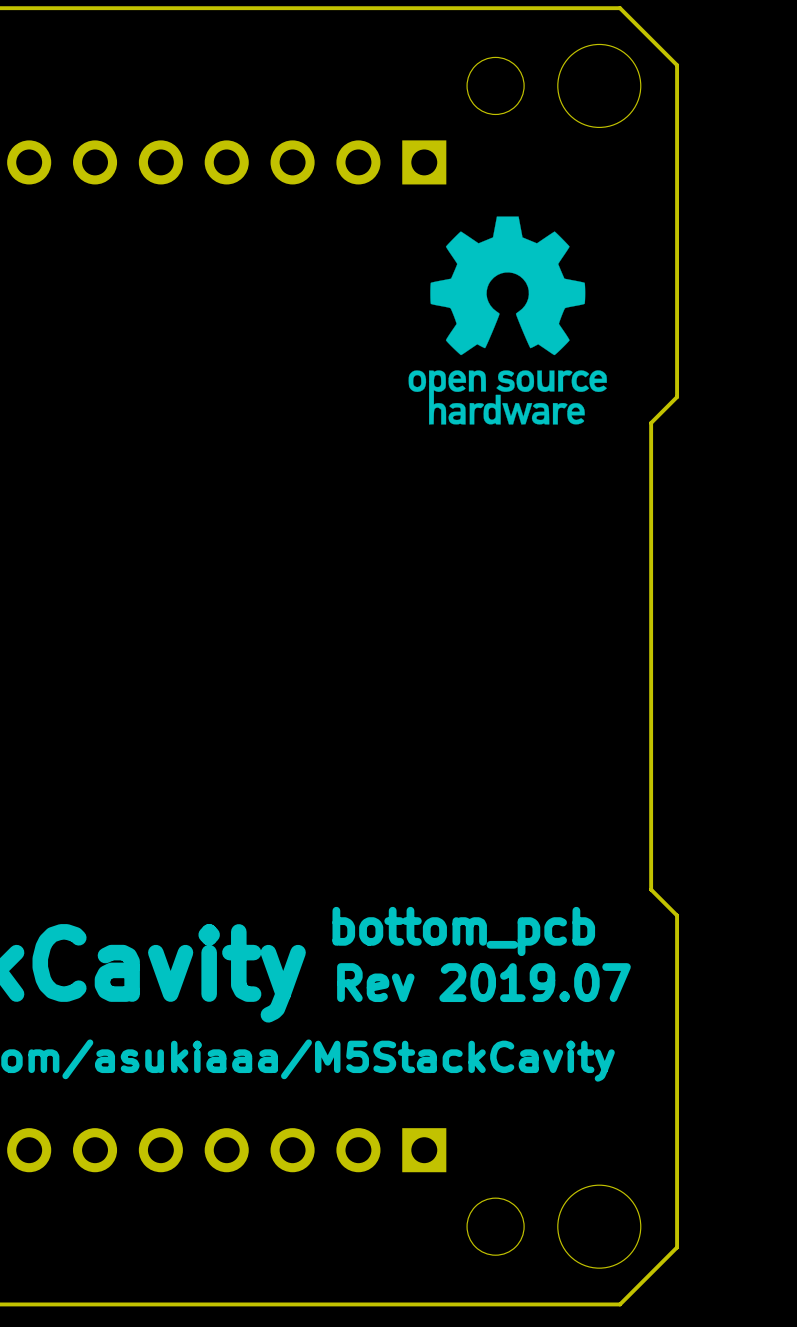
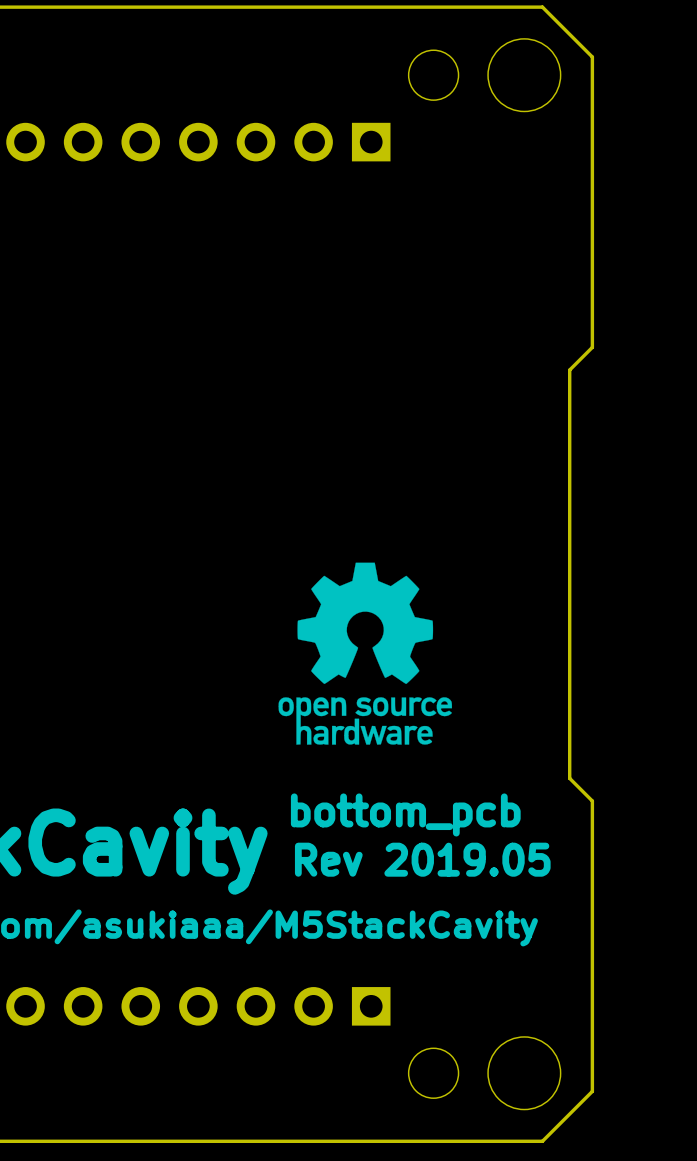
drawing position: (507, 320) -> (365, 653)
text: Rev 2019.07 (483, 982) -> Rev 2019.05 (422, 859)

